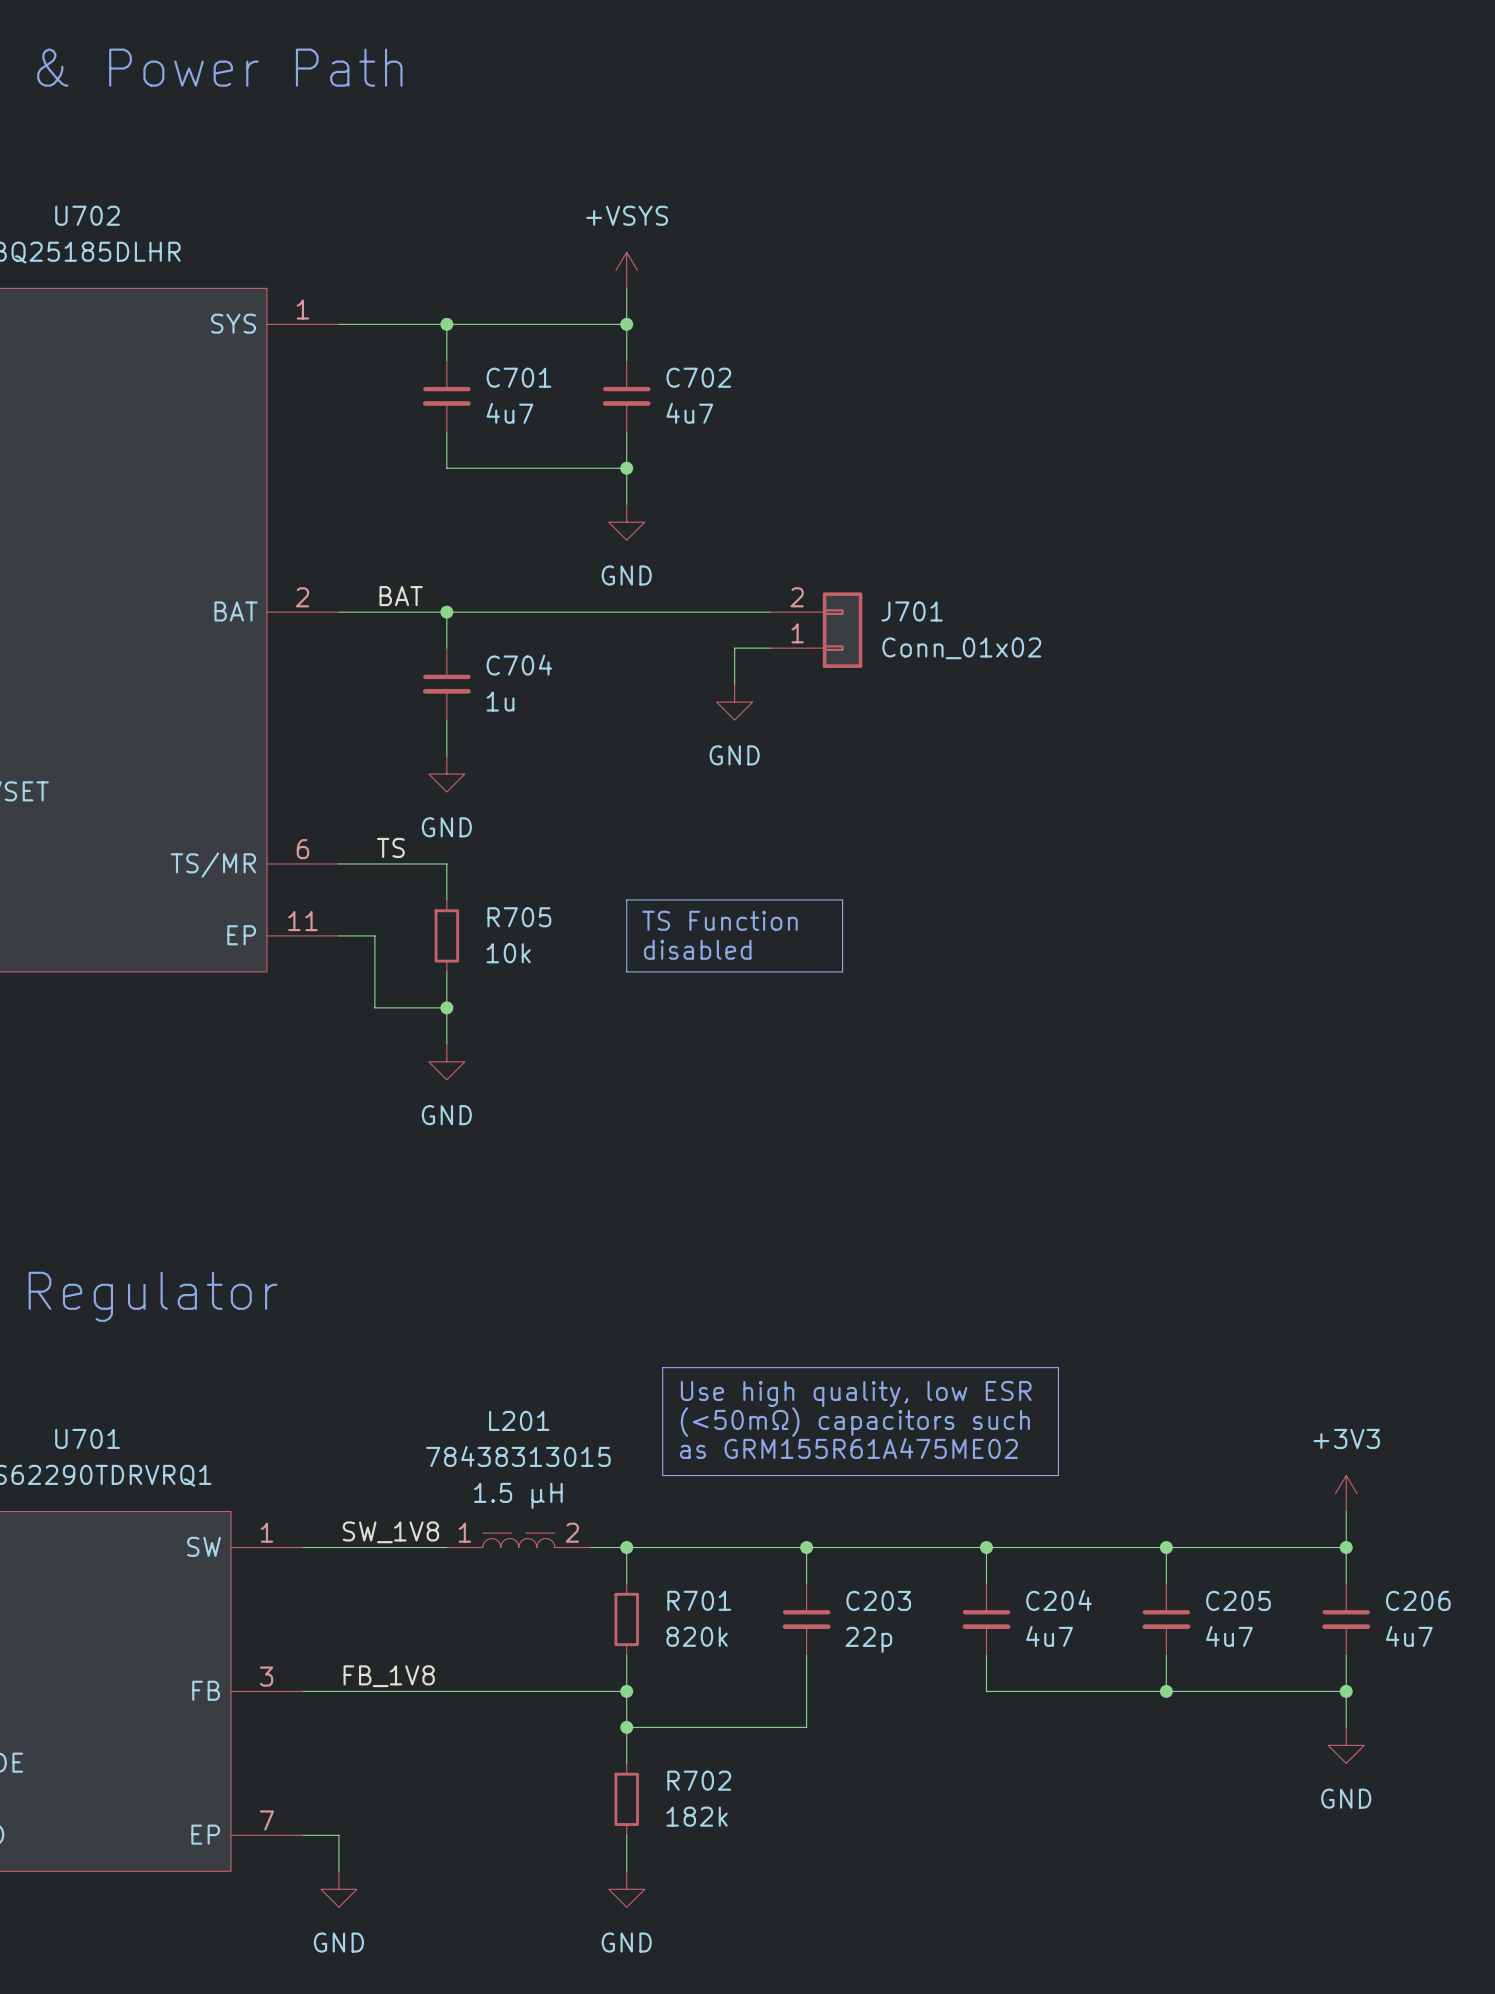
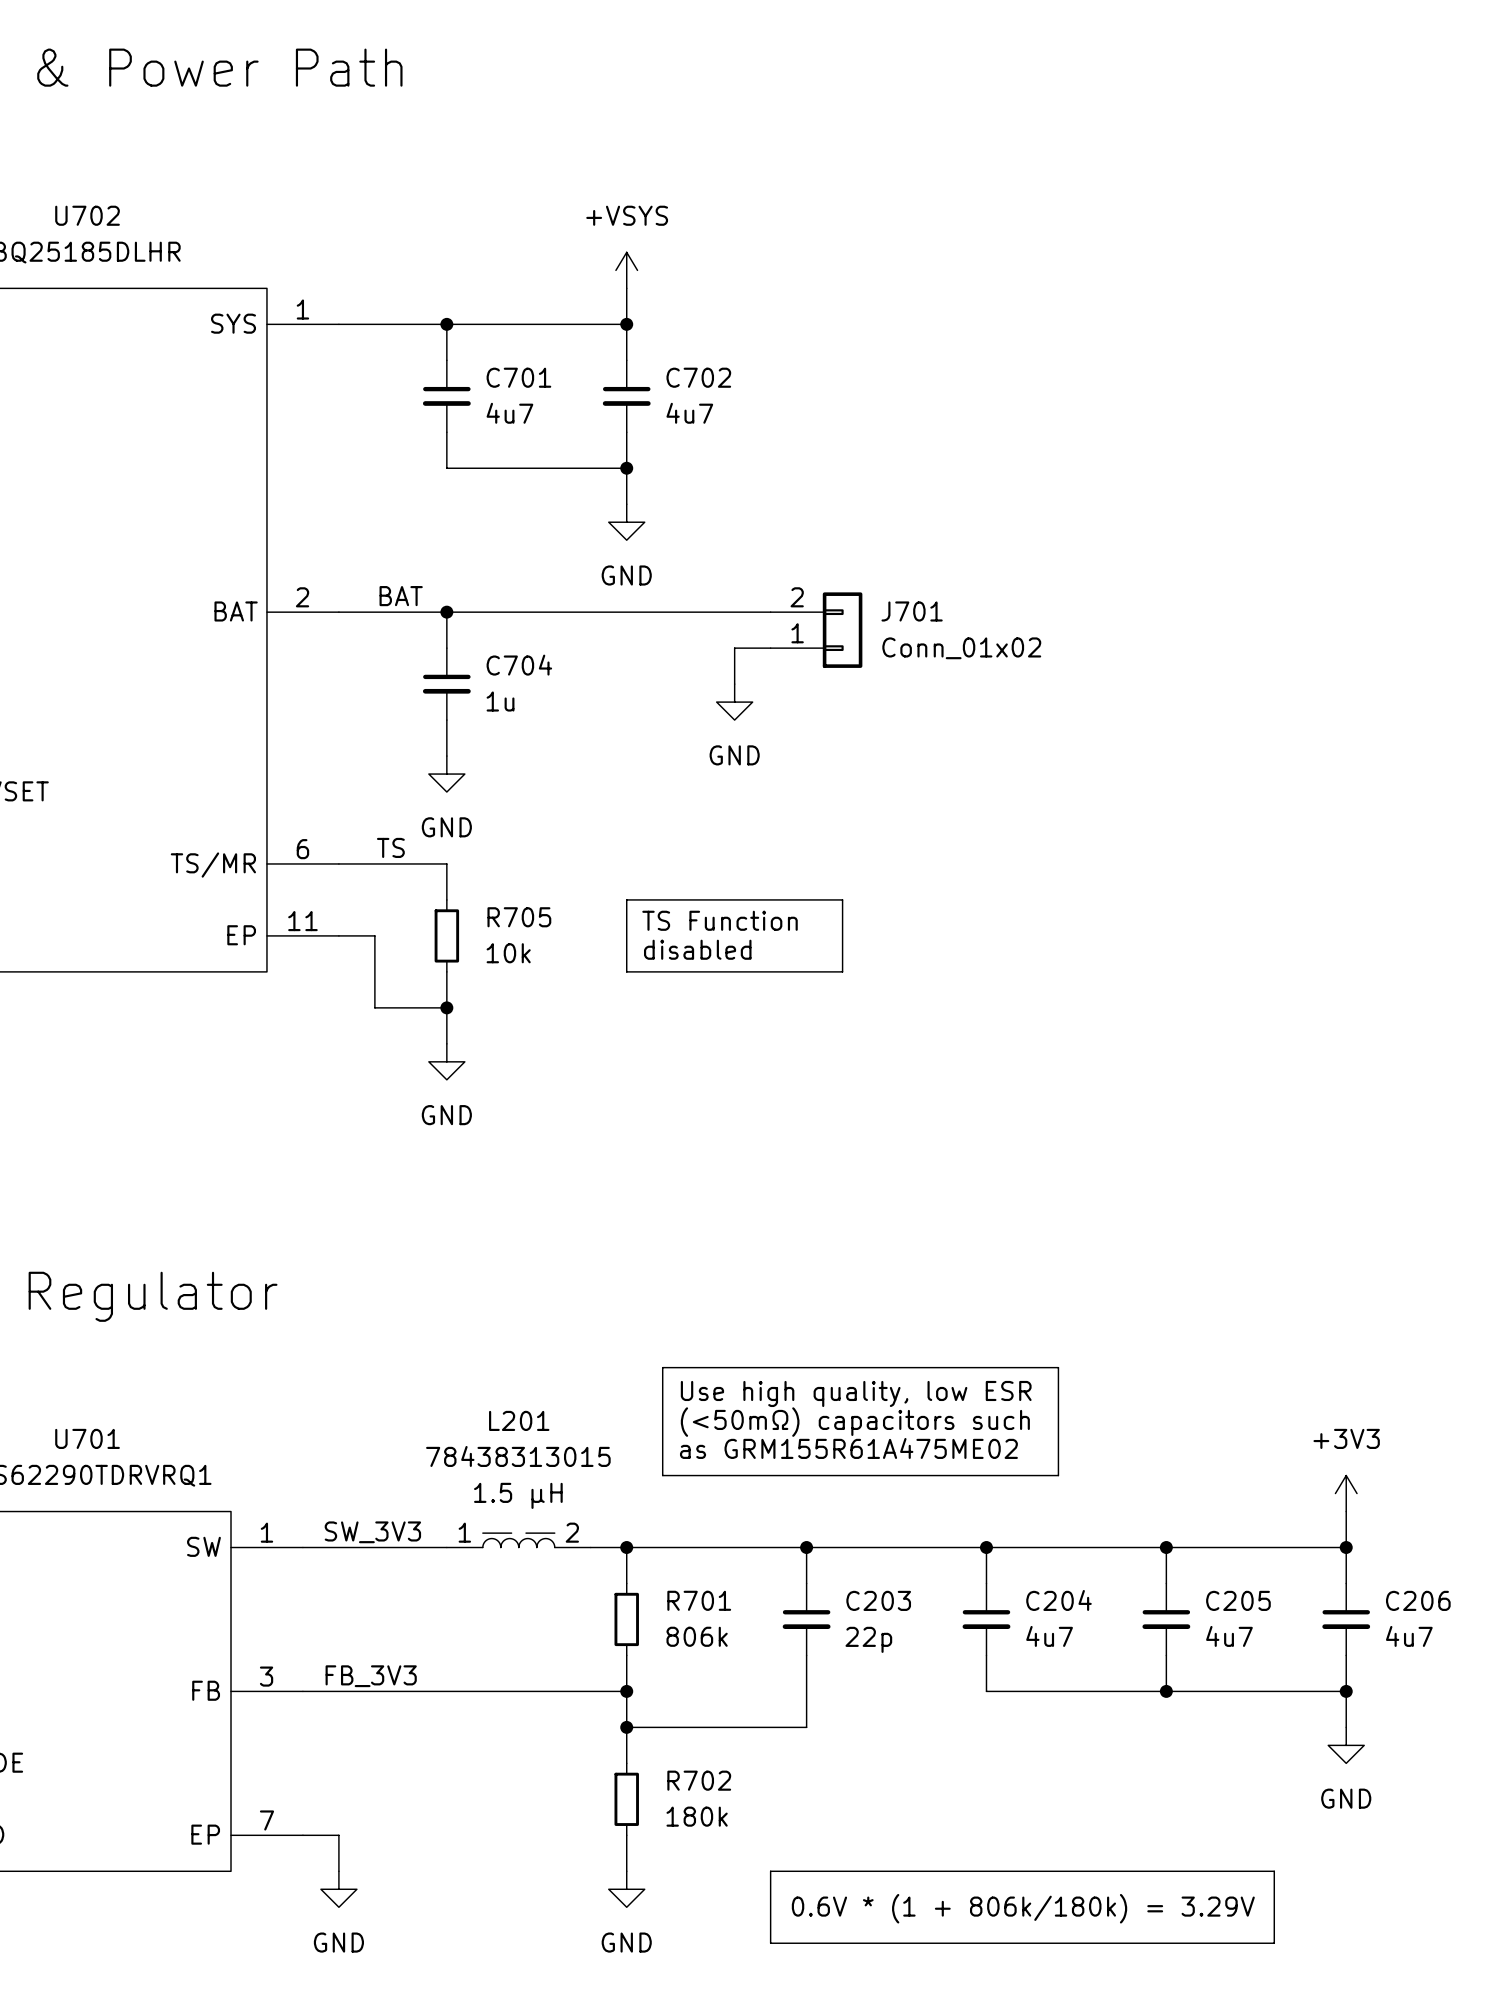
label: SW_1V8 (390, 1532) -> SW_3V3 (372, 1532)
R701 value: 820k (697, 1636) -> 806k (697, 1636)
label: FB_1V8 (389, 1676) -> FB_3V3 (371, 1676)
R702 value: 182k (697, 1816) -> 180k (697, 1816)
line: none -> (770, 1871) (1274, 1871) (1274, 1943) (770, 1943) (770, 1871)
text: none -> 0.6V * (1 + 806k/180k) = 3.29V (1023, 1908)

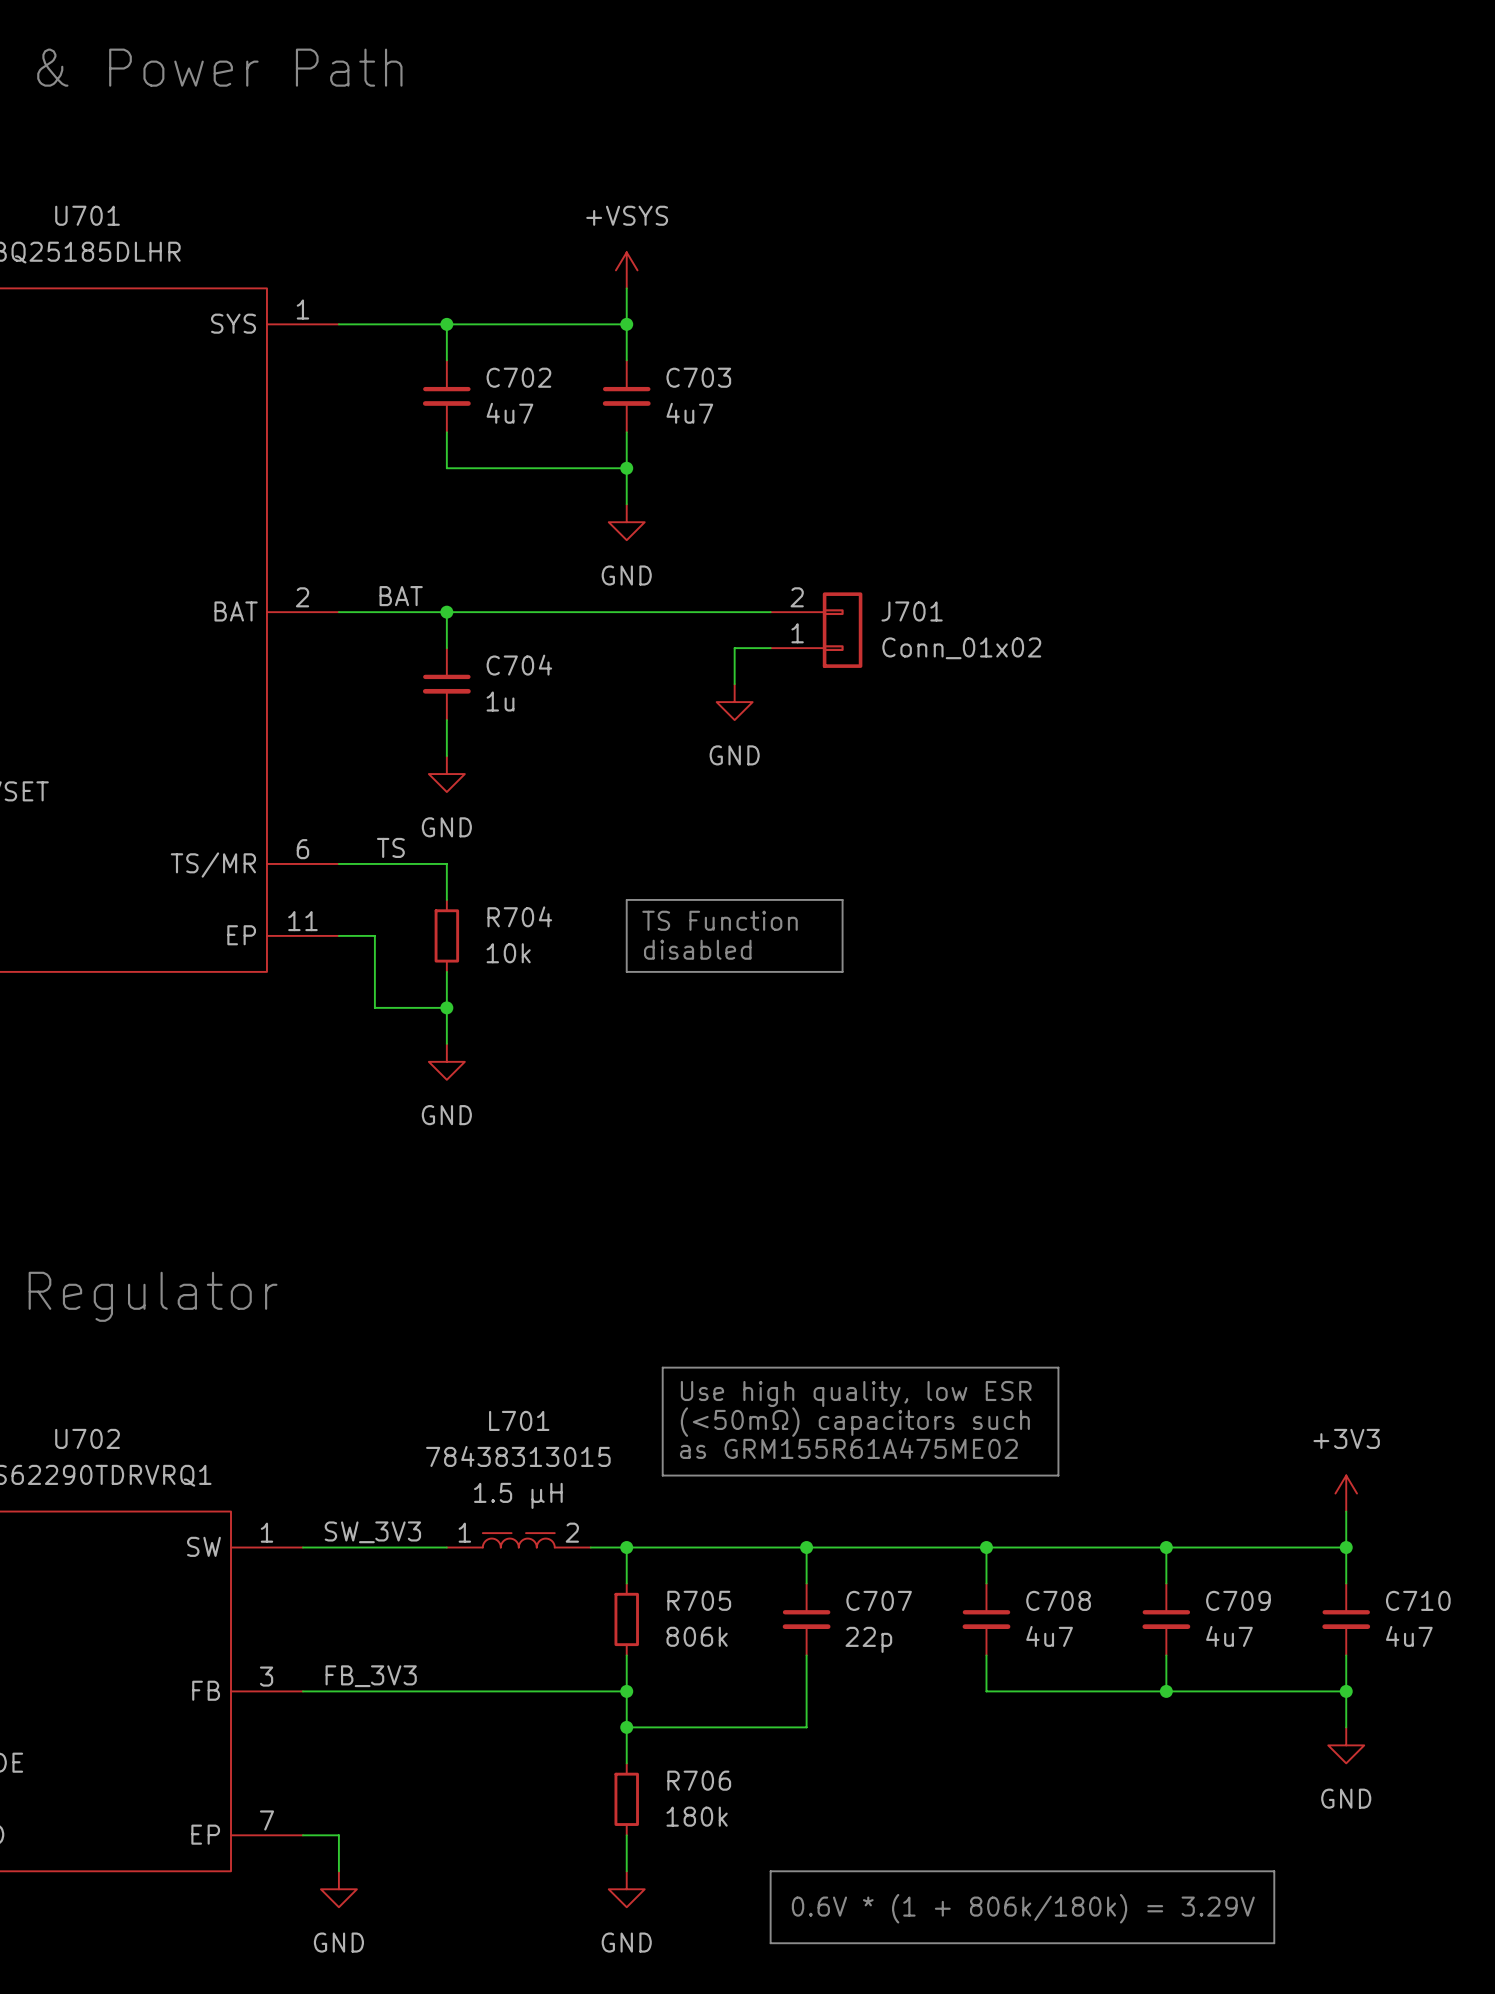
U702 name: U702 (87, 215) -> U701 (87, 215)
C701 name: C701 (518, 377) -> C702 (518, 377)
C702 name: C702 (698, 377) -> C703 (698, 377)
R705 name: R705 (519, 917) -> R704 (519, 916)
L201 name: L201 (519, 1420) -> L701 (519, 1420)
U701 name: U701 (87, 1438) -> U702 (87, 1438)
R701 name: R701 (699, 1600) -> R705 (699, 1600)
C203 name: C203 (878, 1600) -> C707 (879, 1600)
C204 name: C204 (1058, 1600) -> C708 (1058, 1600)
C205 name: C205 (1238, 1600) -> C709 (1238, 1600)
C206 name: C206 (1418, 1600) -> C710 (1418, 1600)
R702 name: R702 (699, 1780) -> R706 (699, 1780)

